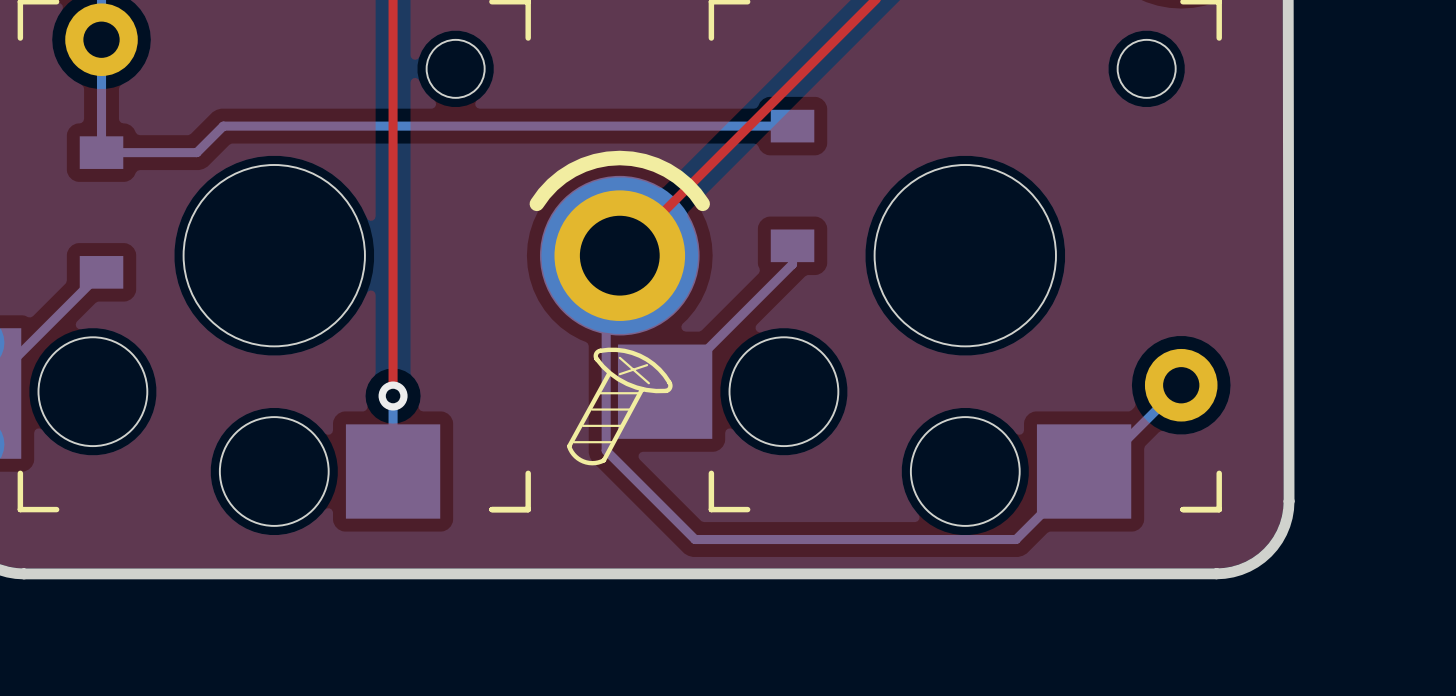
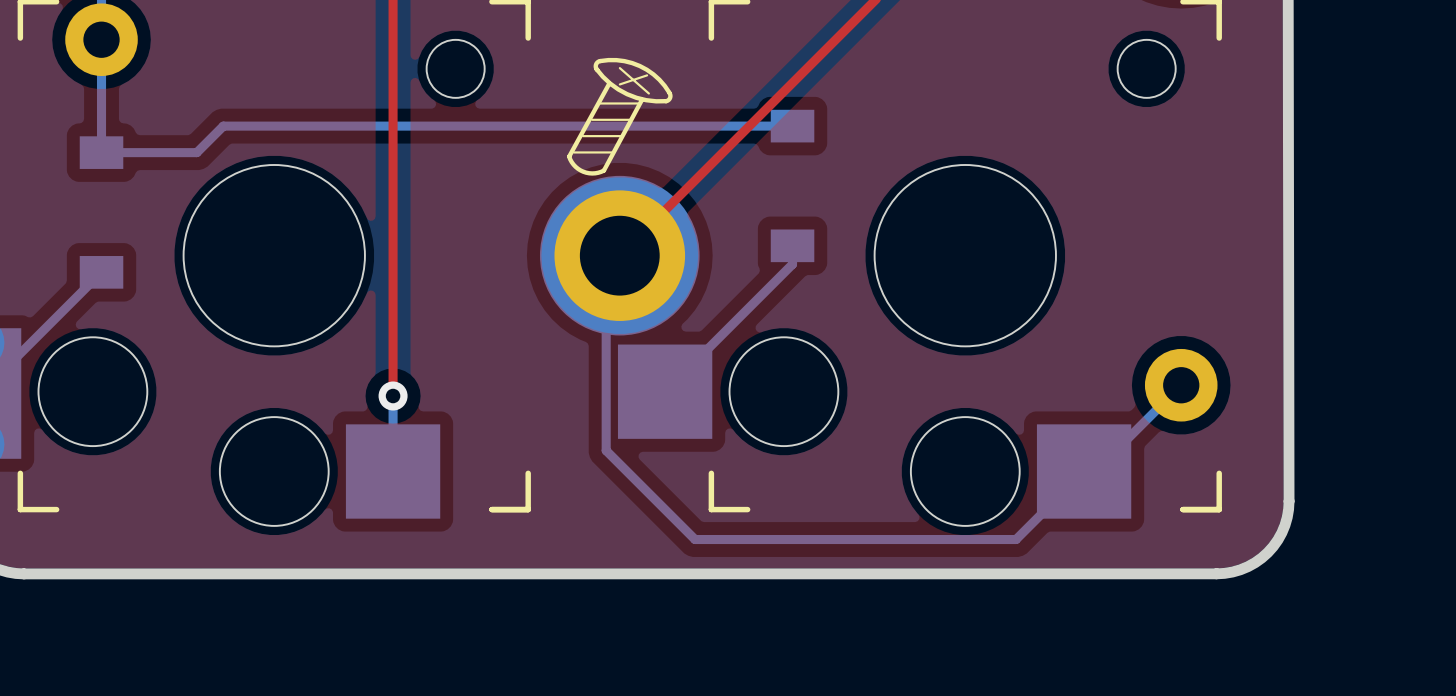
drawing: none -> [566, 57, 673, 176]
part footprint: [529, 150, 710, 336] -> [539, 175, 700, 336]
drawing: [566, 347, 673, 466] -> none

